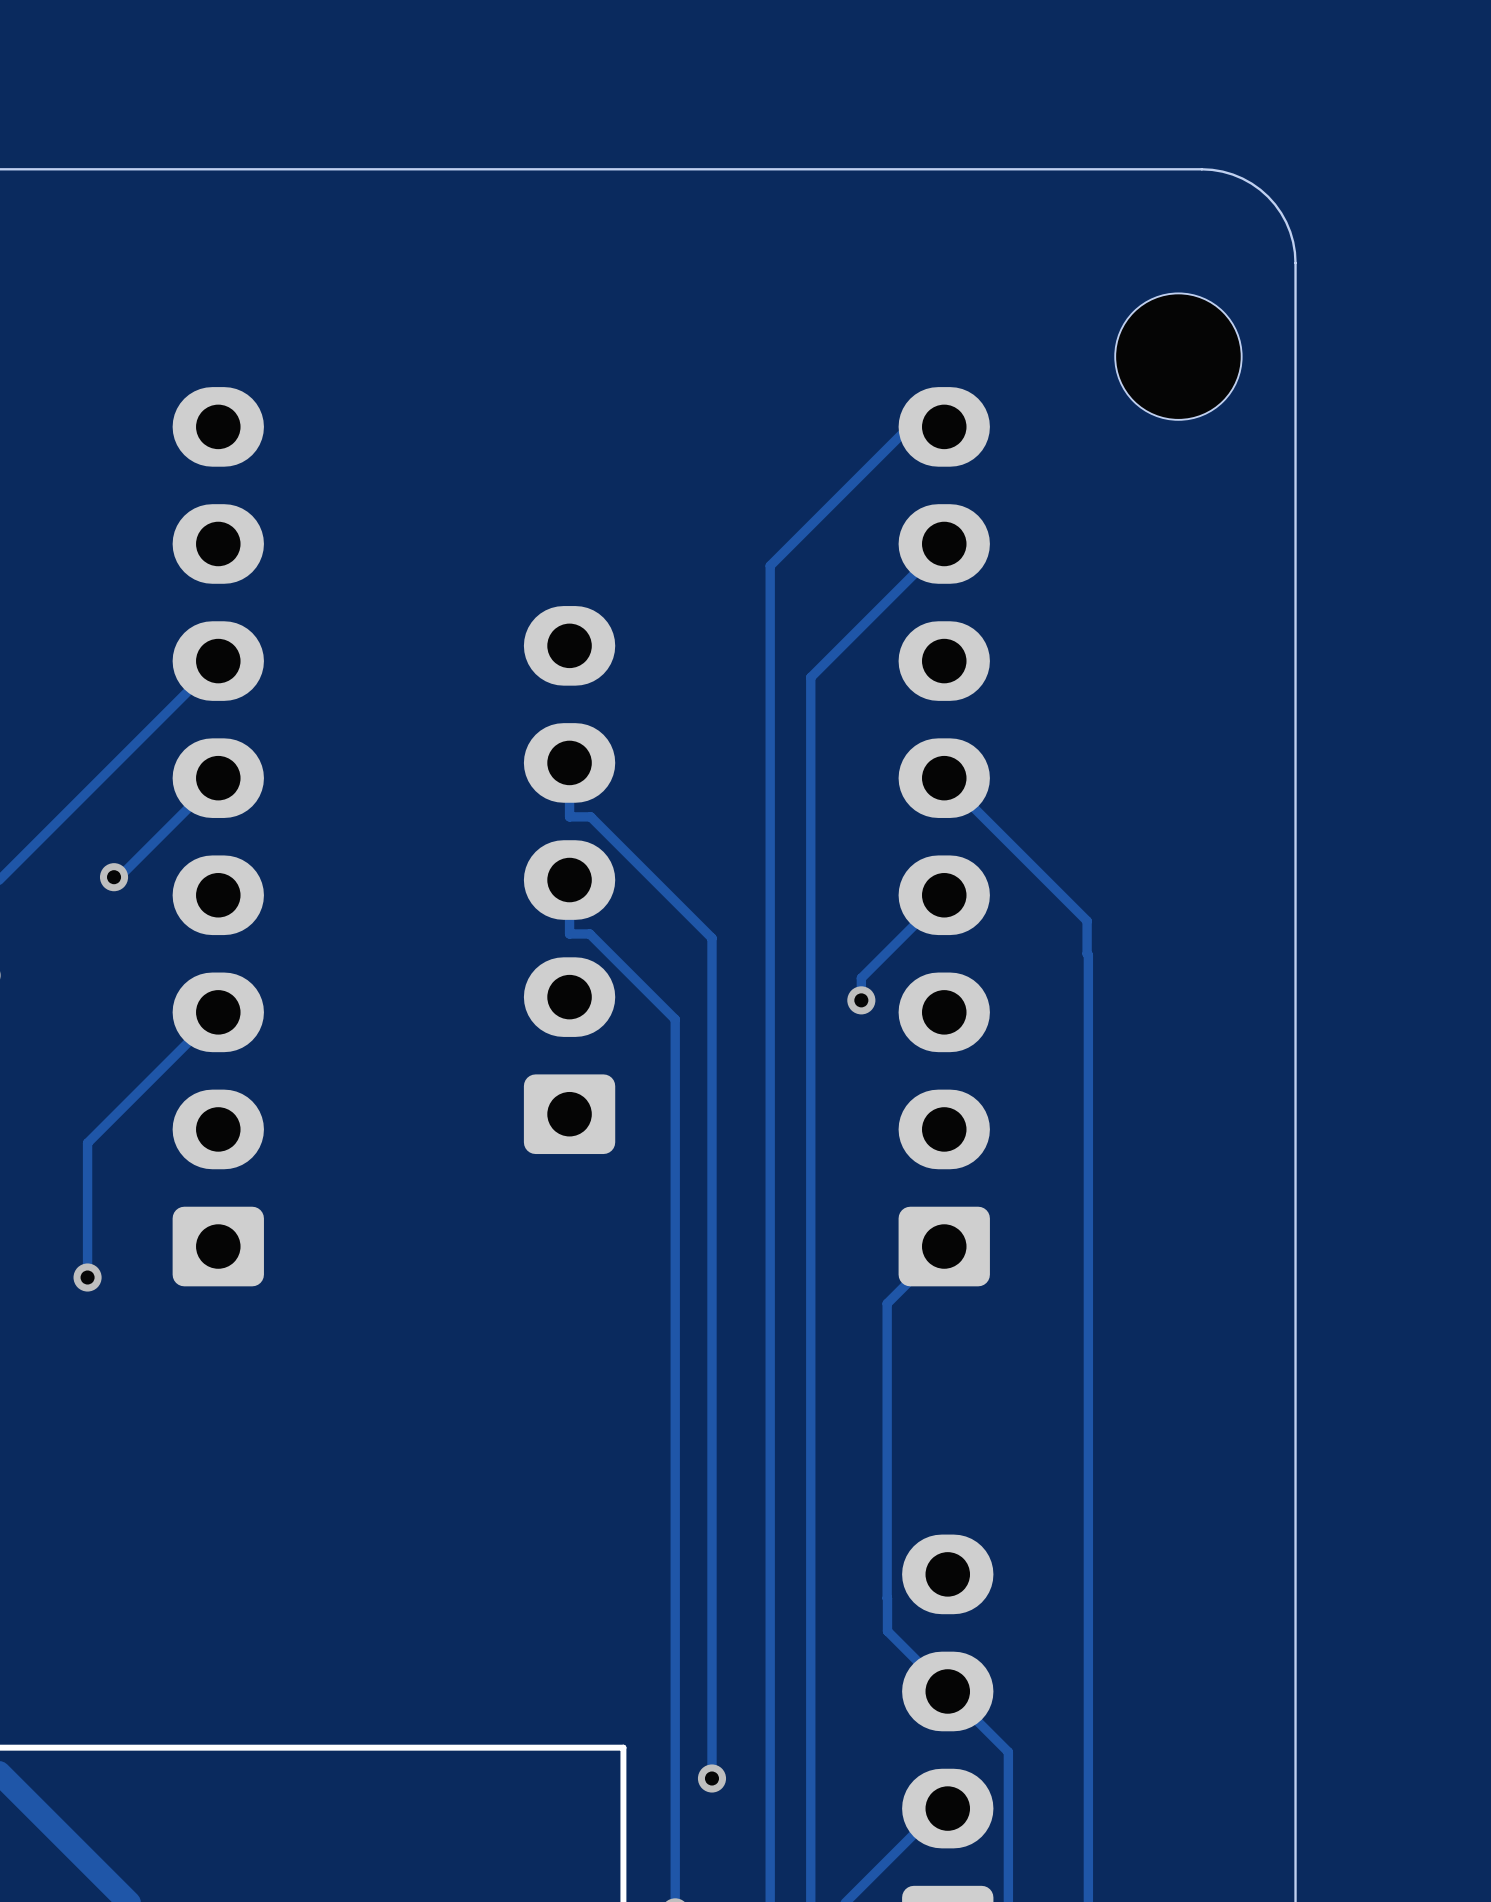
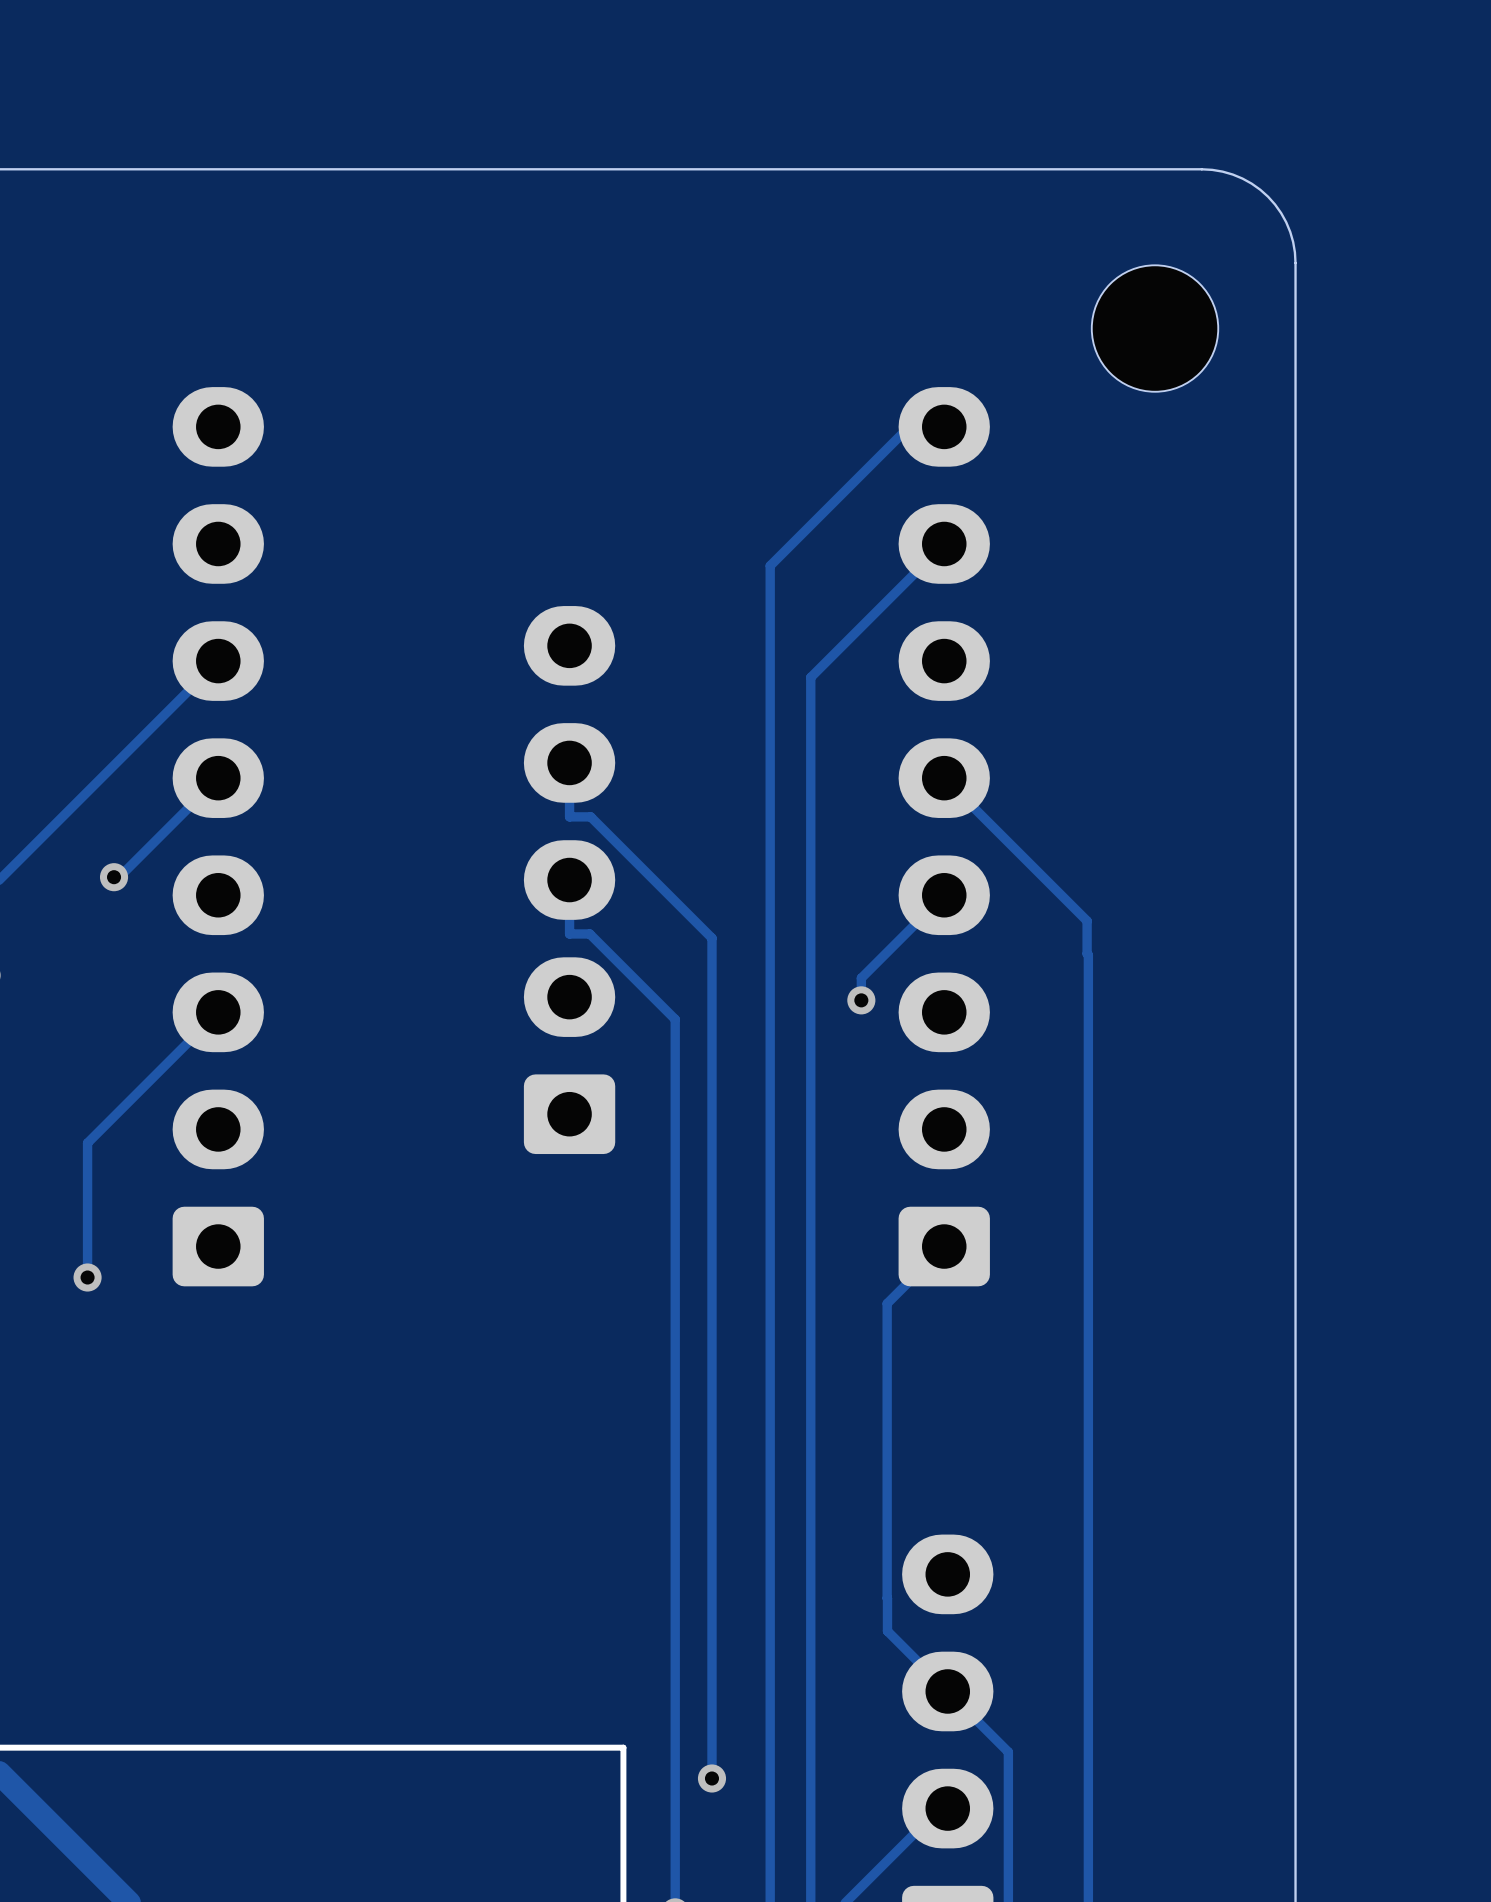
part position: (1178, 356) -> (1155, 328)

